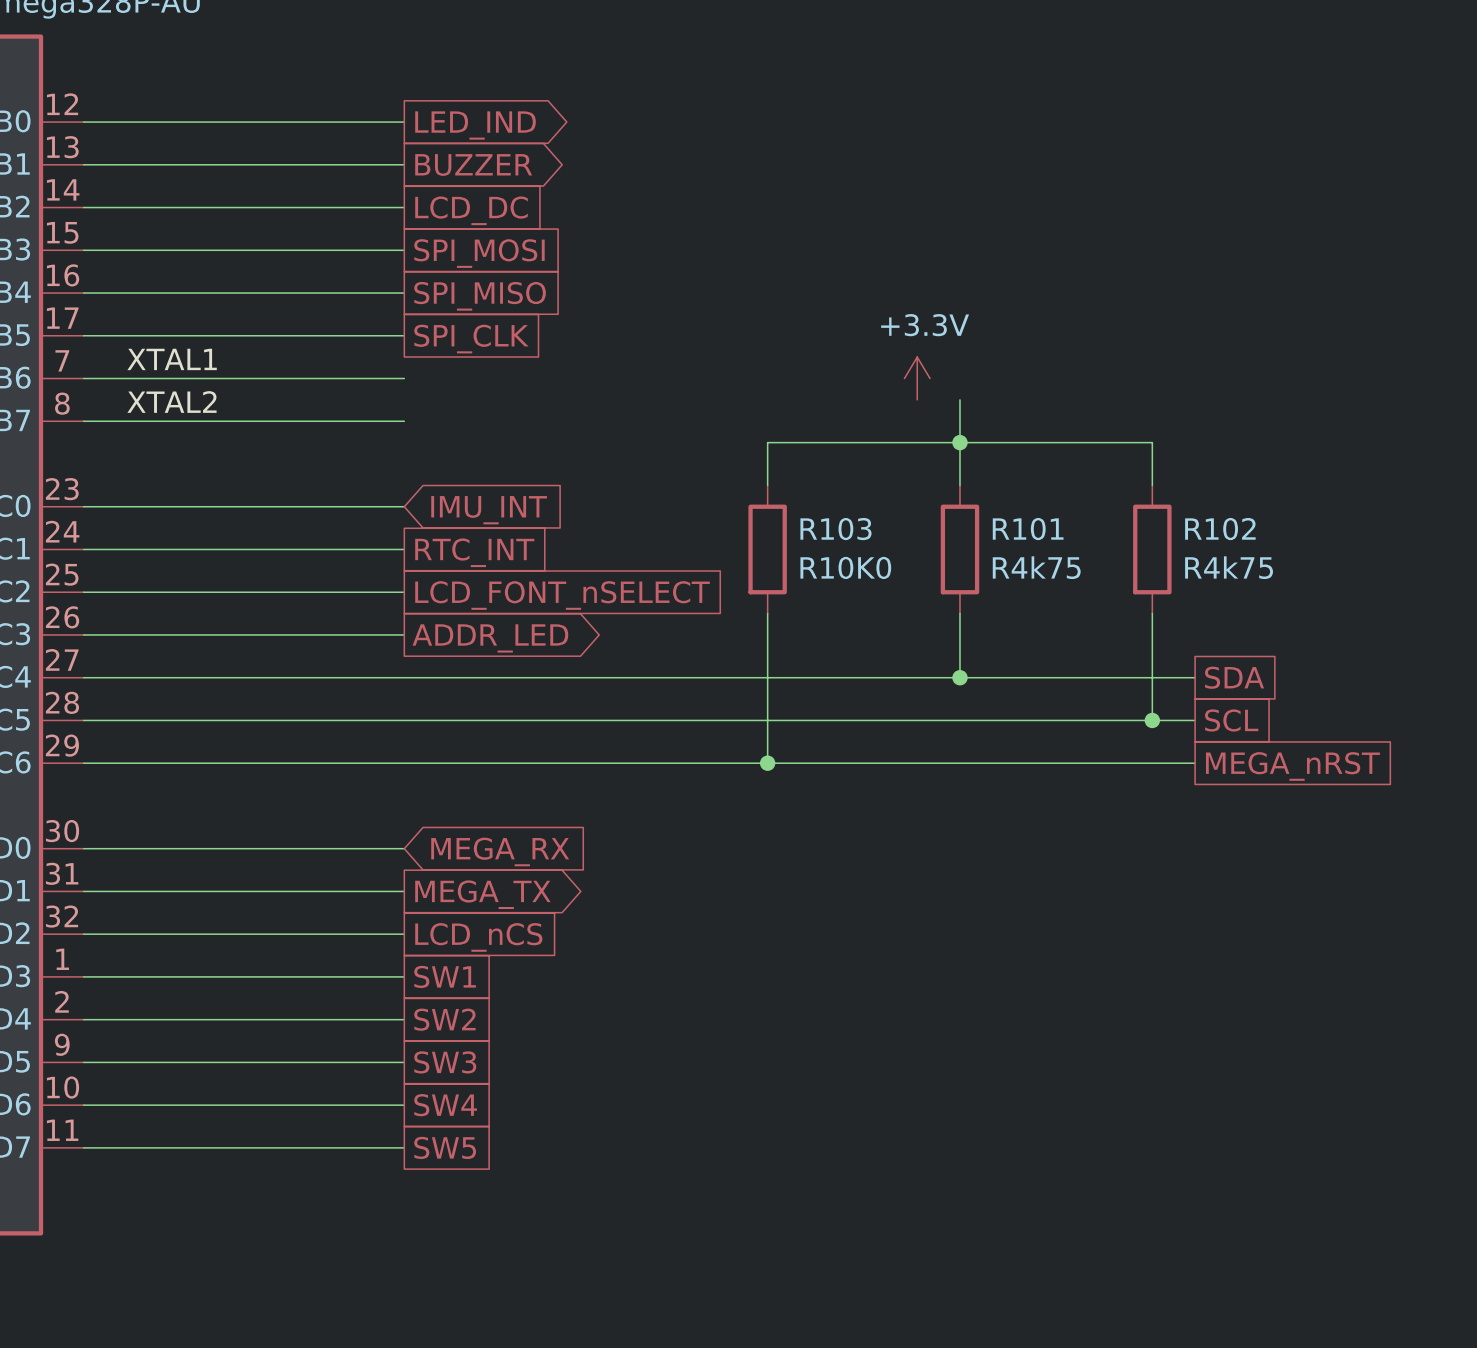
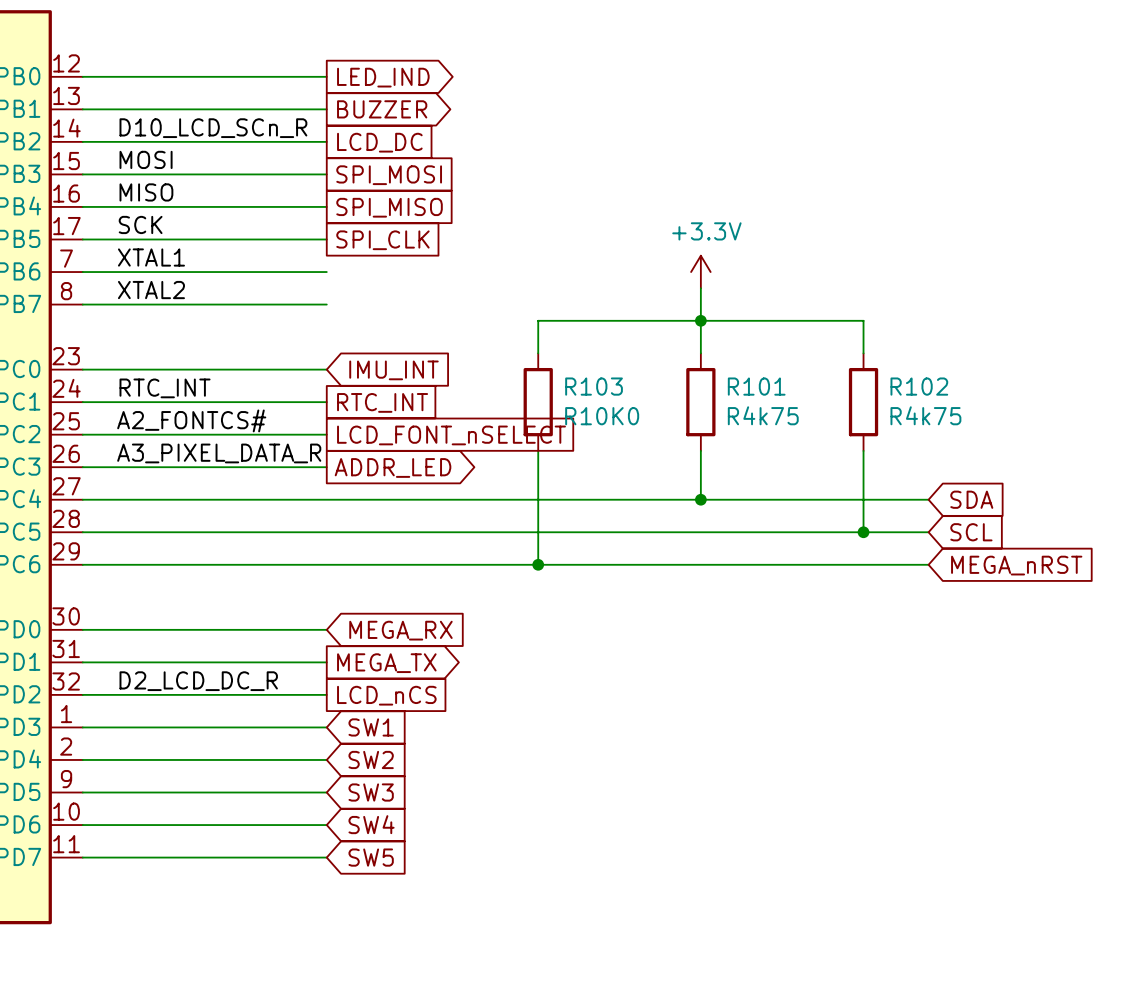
label: none -> D10_LCD_SCn_R (213, 128)
label: none -> MOSI (146, 159)
label: none -> MISO (146, 192)
label: none -> SCK (140, 224)
power symbol position: +3.3V (917, 378) -> +3.3V (700, 272)
wire: (959, 399) (959, 485) -> (700, 288) (700, 353)
wire: (767, 442) (767, 485) -> (603, 320) (538, 320) (538, 353)
junction position: (959, 442) -> (700, 320)
wire: (1109, 442) (1152, 442) (1152, 485) -> (863, 320) (863, 353)
label: none -> RTC_INT (165, 388)
R103 position: (767, 549) -> (538, 402)
R101 position: (959, 549) -> (700, 402)
R102 position: (1152, 549) -> (863, 402)
label: none -> A2_FONTCS# (191, 420)
wire: (767, 613) (767, 763) -> (538, 450) (538, 564)
wire: (959, 613) (959, 677) -> (700, 450) (700, 499)
wire: (1152, 613) (1152, 720) -> (863, 450) (863, 532)
label: none -> A3_PIXEL_DATA_R (219, 453)
junction position: (959, 677) -> (700, 499)
global label shape: passive (1234, 677) -> input (971, 499)
junction position: (1152, 720) -> (863, 532)
global label shape: passive (1231, 720) -> input (971, 532)
junction: none -> (538, 564)
junction: (767, 763) -> none
global label shape: passive (1292, 766) -> input (1016, 565)
label: none -> D2_LCD_DC_R (198, 681)
global label shape: passive (445, 976) -> input (371, 727)
global label shape: passive (444, 1019) -> input (371, 759)
global label shape: passive (445, 1062) -> input (371, 792)
global label shape: passive (445, 1105) -> input (371, 824)
global label shape: passive (445, 1147) -> input (371, 857)

